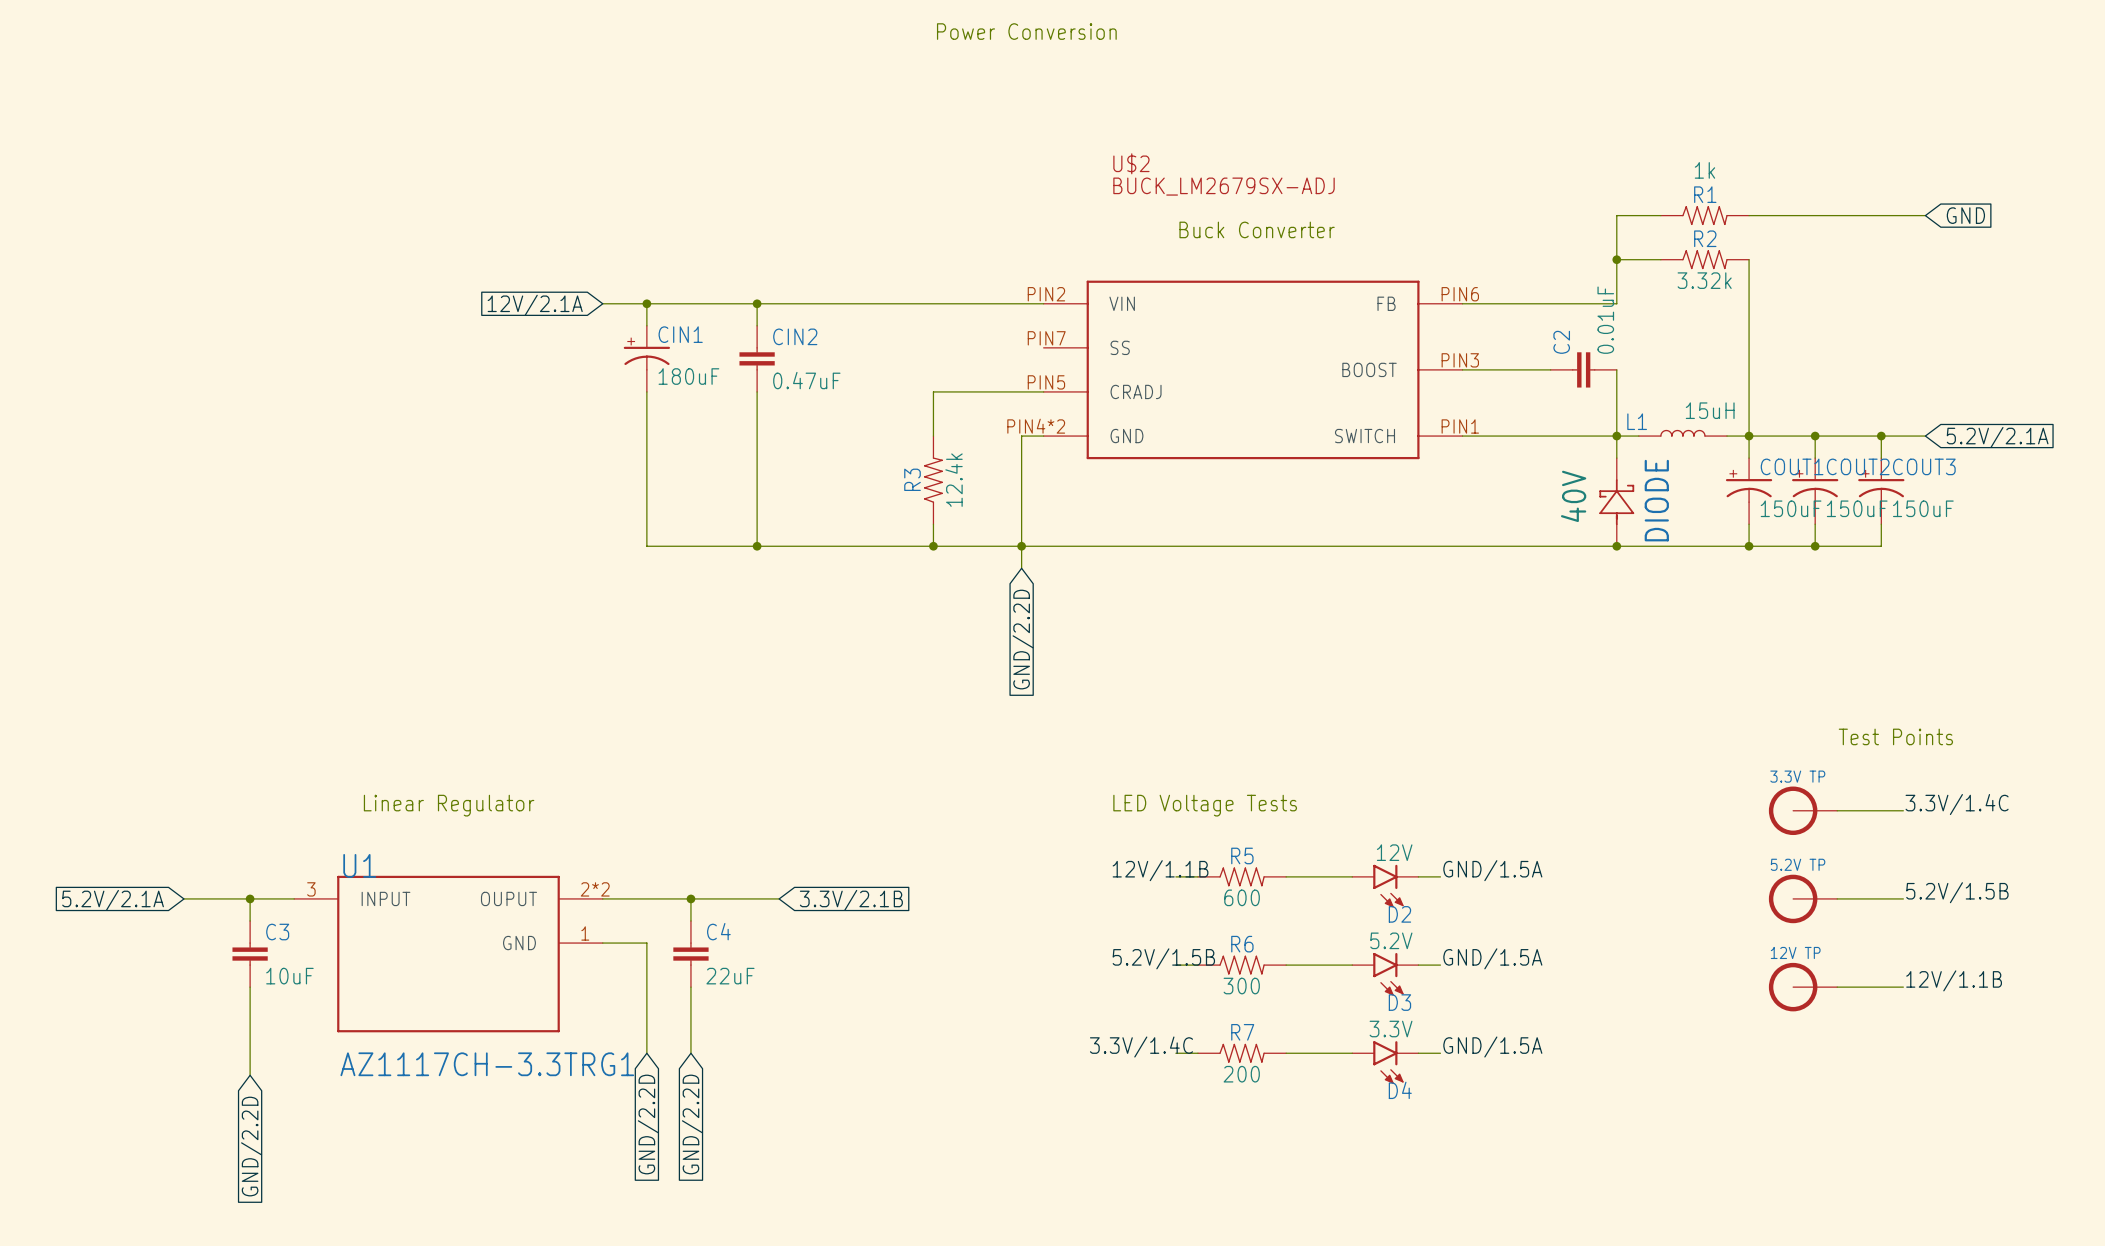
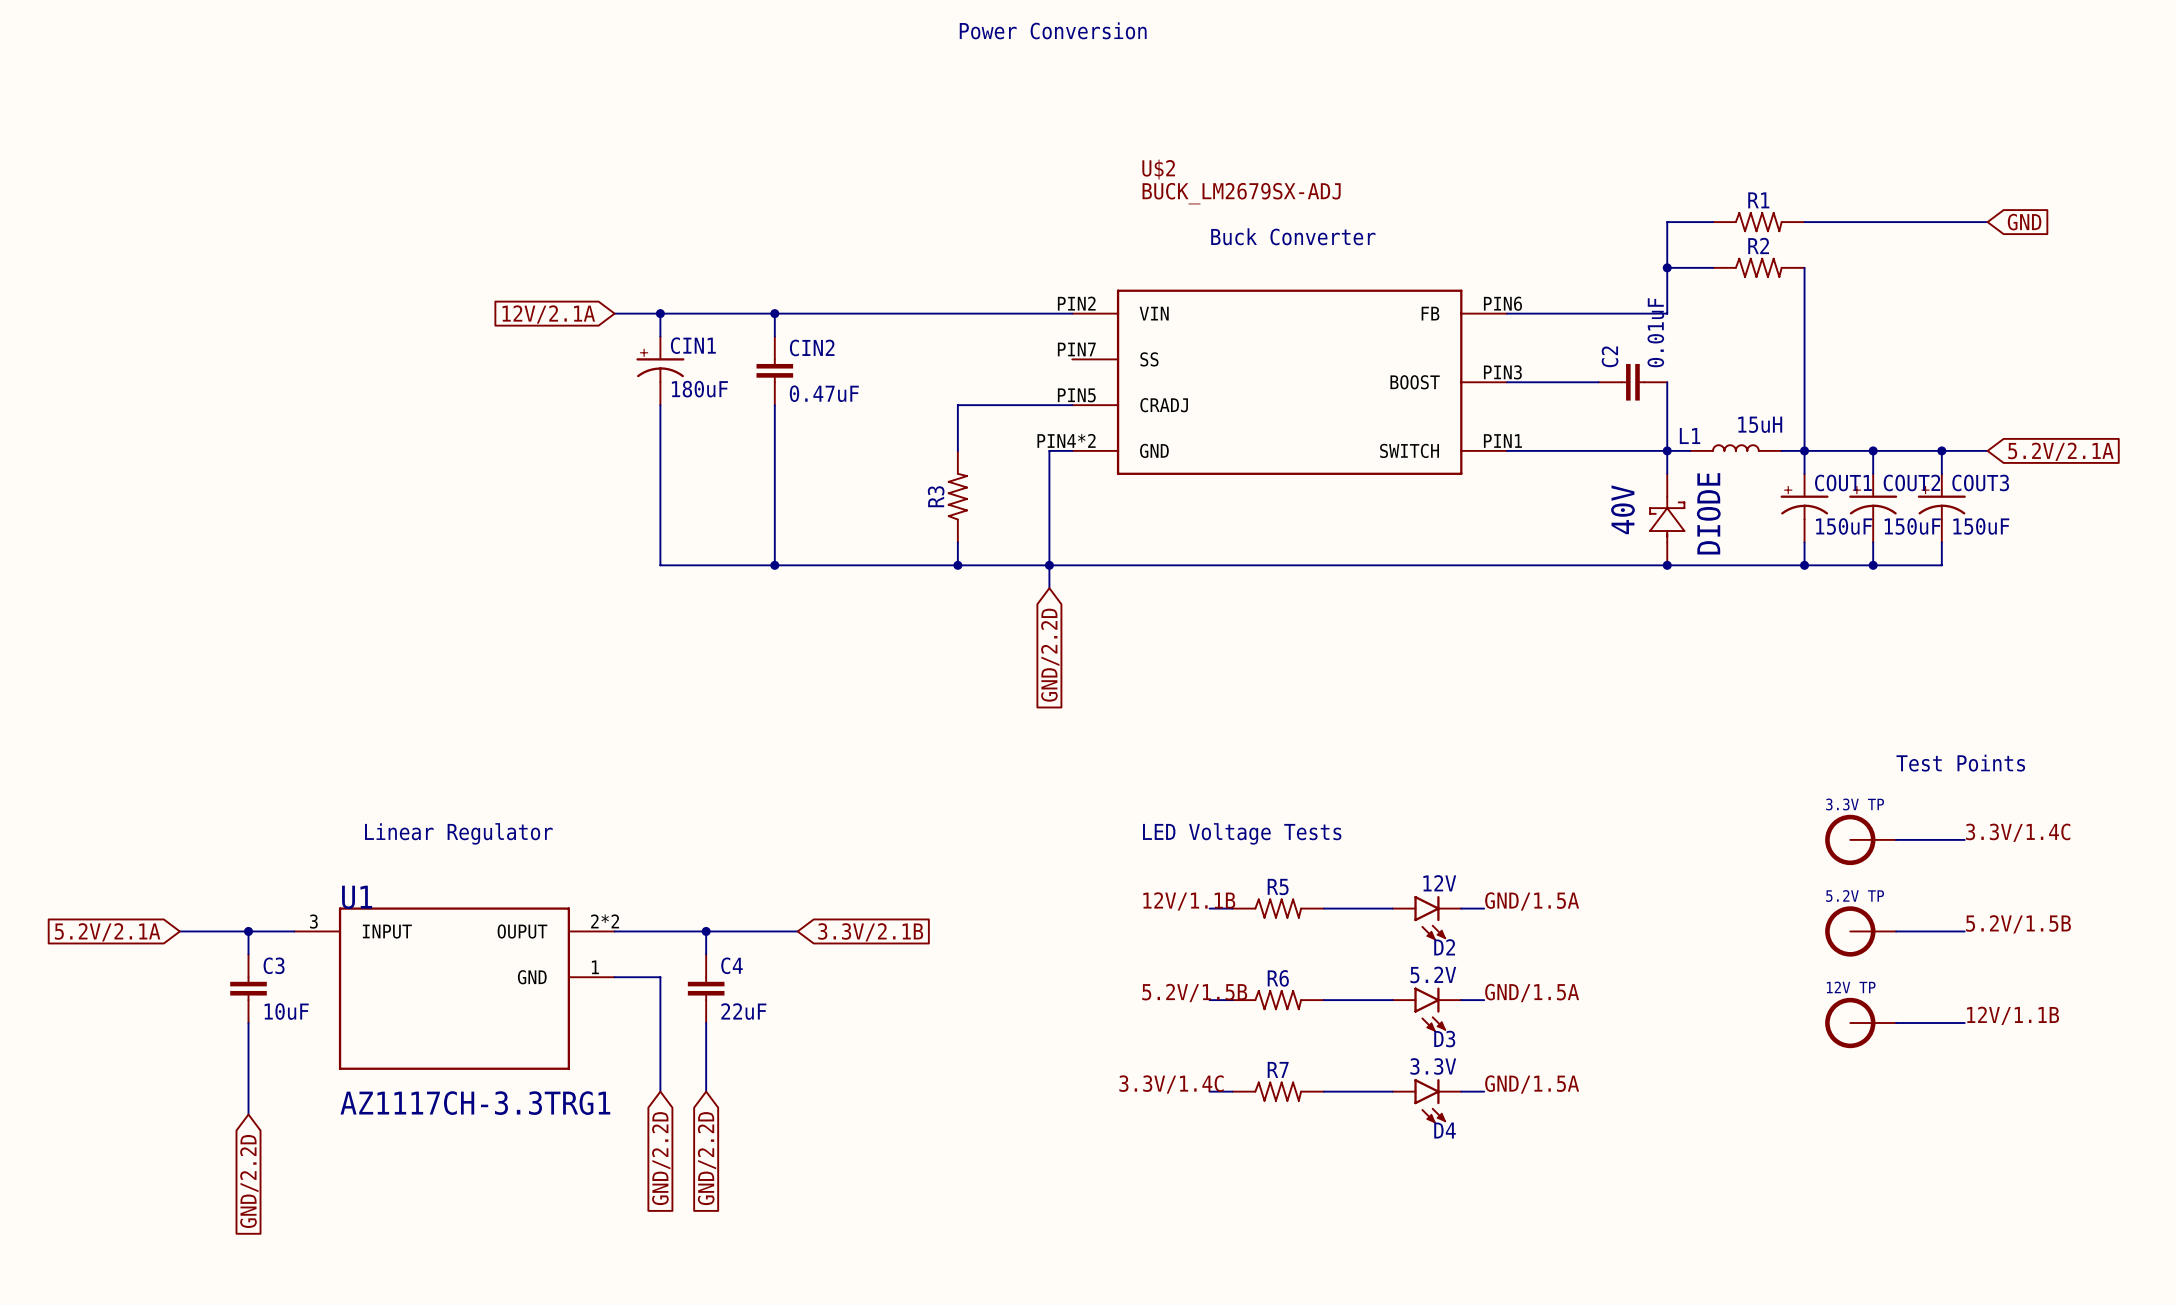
R1 value: 1k (1704, 170) -> none
R2 value: 3.32k (1704, 280) -> none
R3 value: 12.4k (954, 480) -> none
R5 value: 600 (1242, 897) -> none
R6 value: 300 (1241, 986) -> none
R7 value: 200 (1241, 1074) -> none

